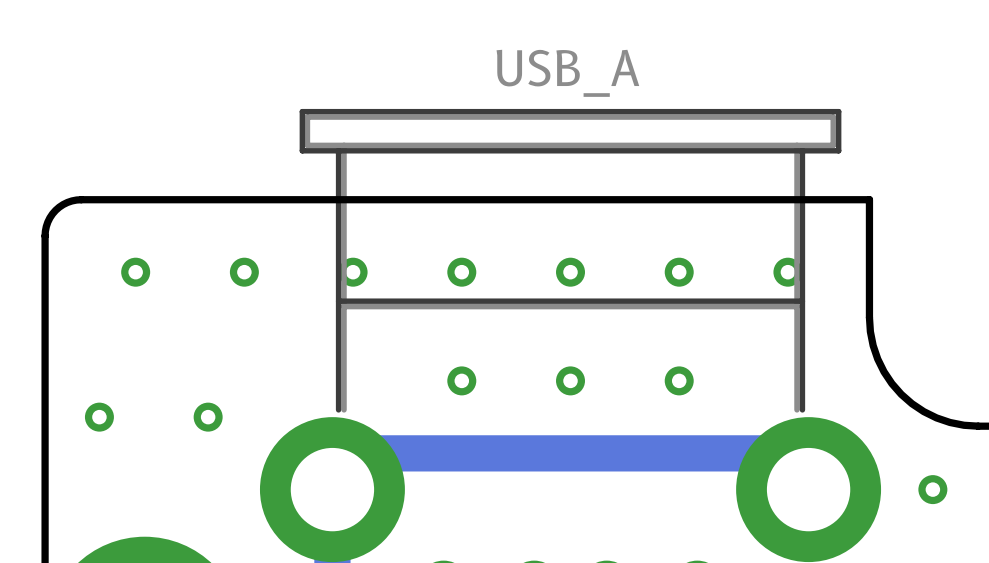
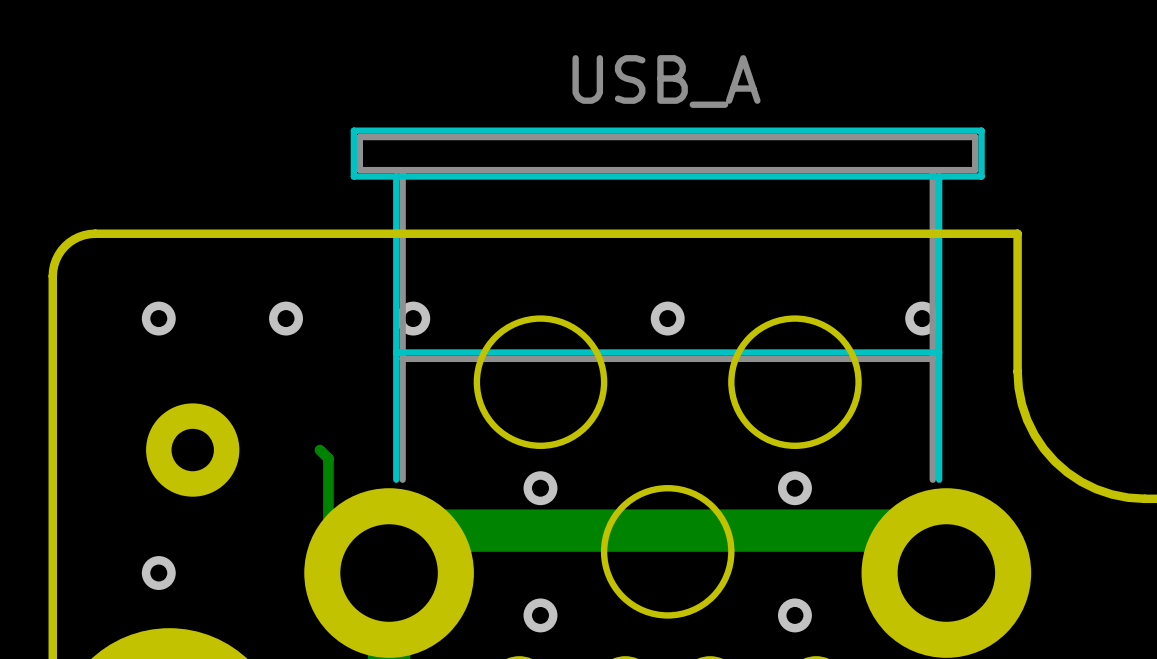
round board edge: none -> [473, 315, 608, 449]
round board edge: none -> [728, 315, 862, 449]
via: (461, 272) -> none
via: (679, 272) -> none
via position: (461, 380) -> (540, 488)
via: (570, 380) -> none
via position: (679, 380) -> (794, 488)
part: none -> (192, 450)
bottom track: none -> (319, 450) (328, 458) (328, 557)
round board edge: none -> [600, 485, 735, 619]
via: (99, 417) -> none
via: (208, 417) -> none
via: none -> (158, 573)
via: (932, 489) -> none
via: none -> (540, 615)
via: none -> (794, 615)

